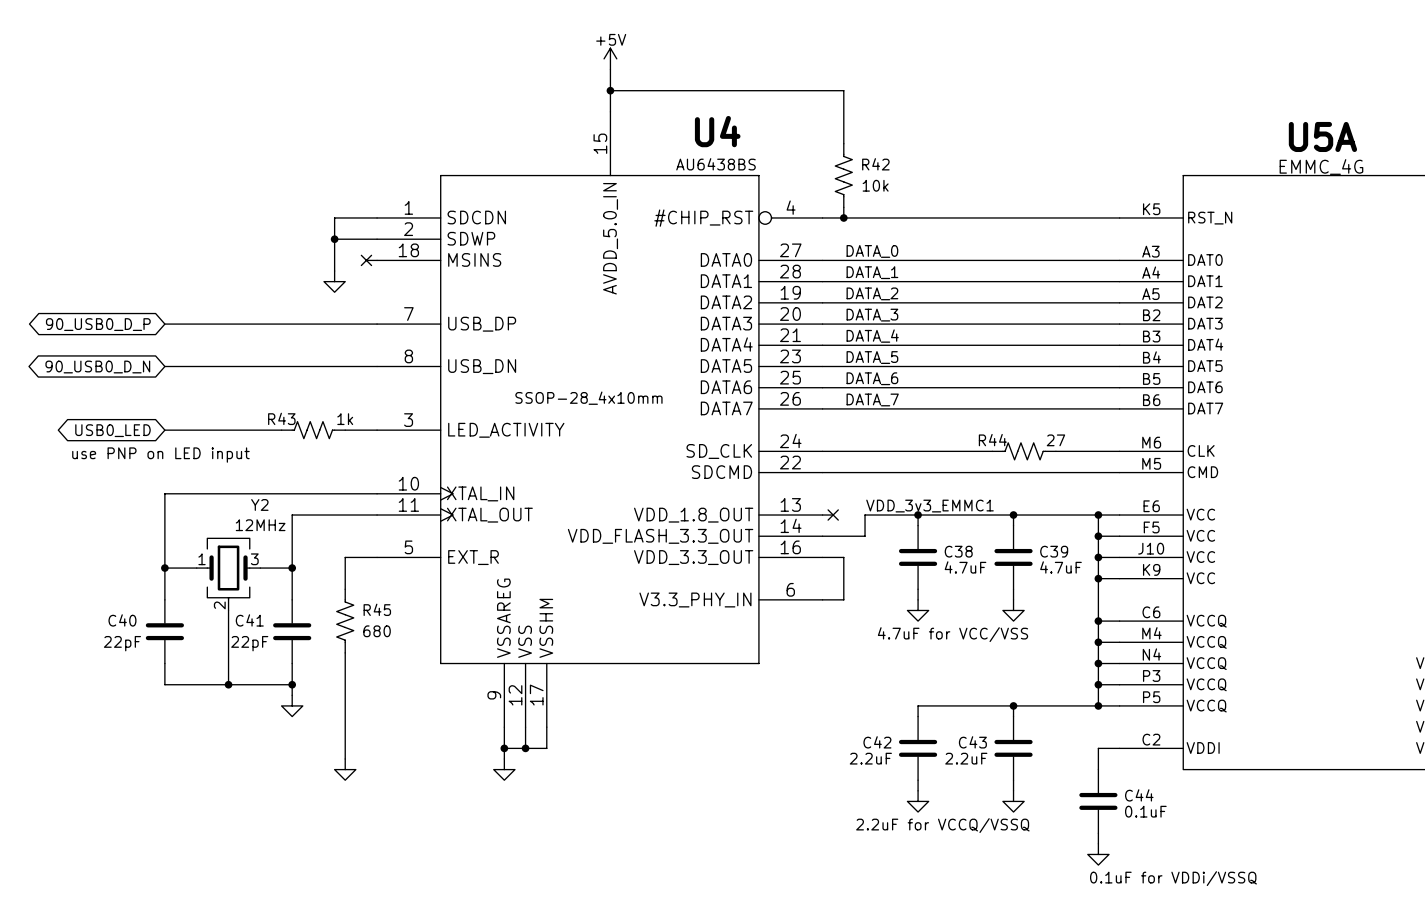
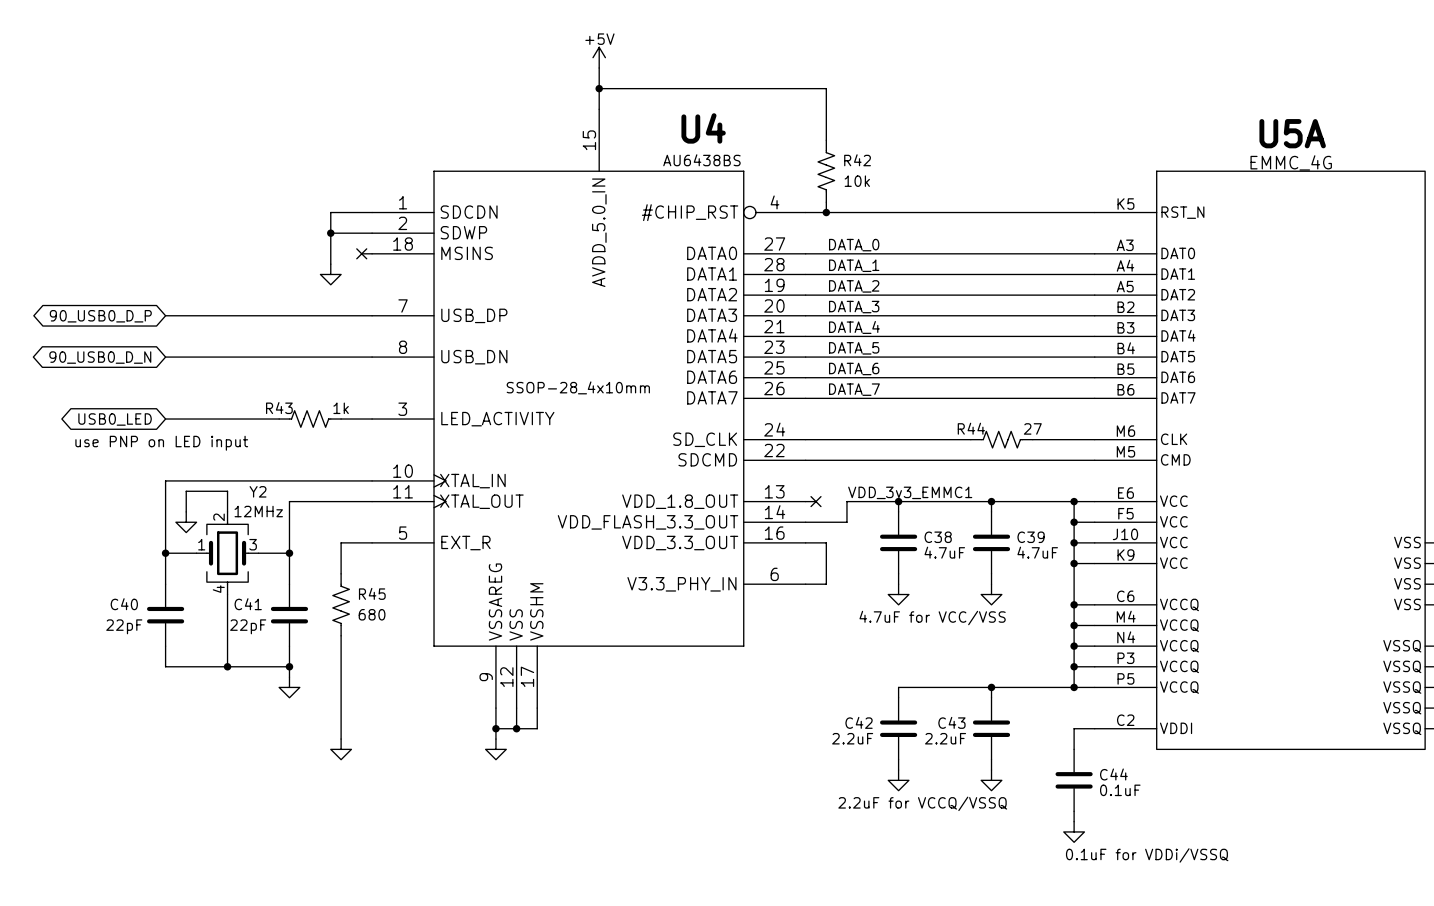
wire: none -> (186, 511) (186, 491) (227, 491) (227, 511)
power symbol: none -> (186, 522)
Y2 symbol: [196, 538, 261, 611] -> [196, 511, 259, 595]

